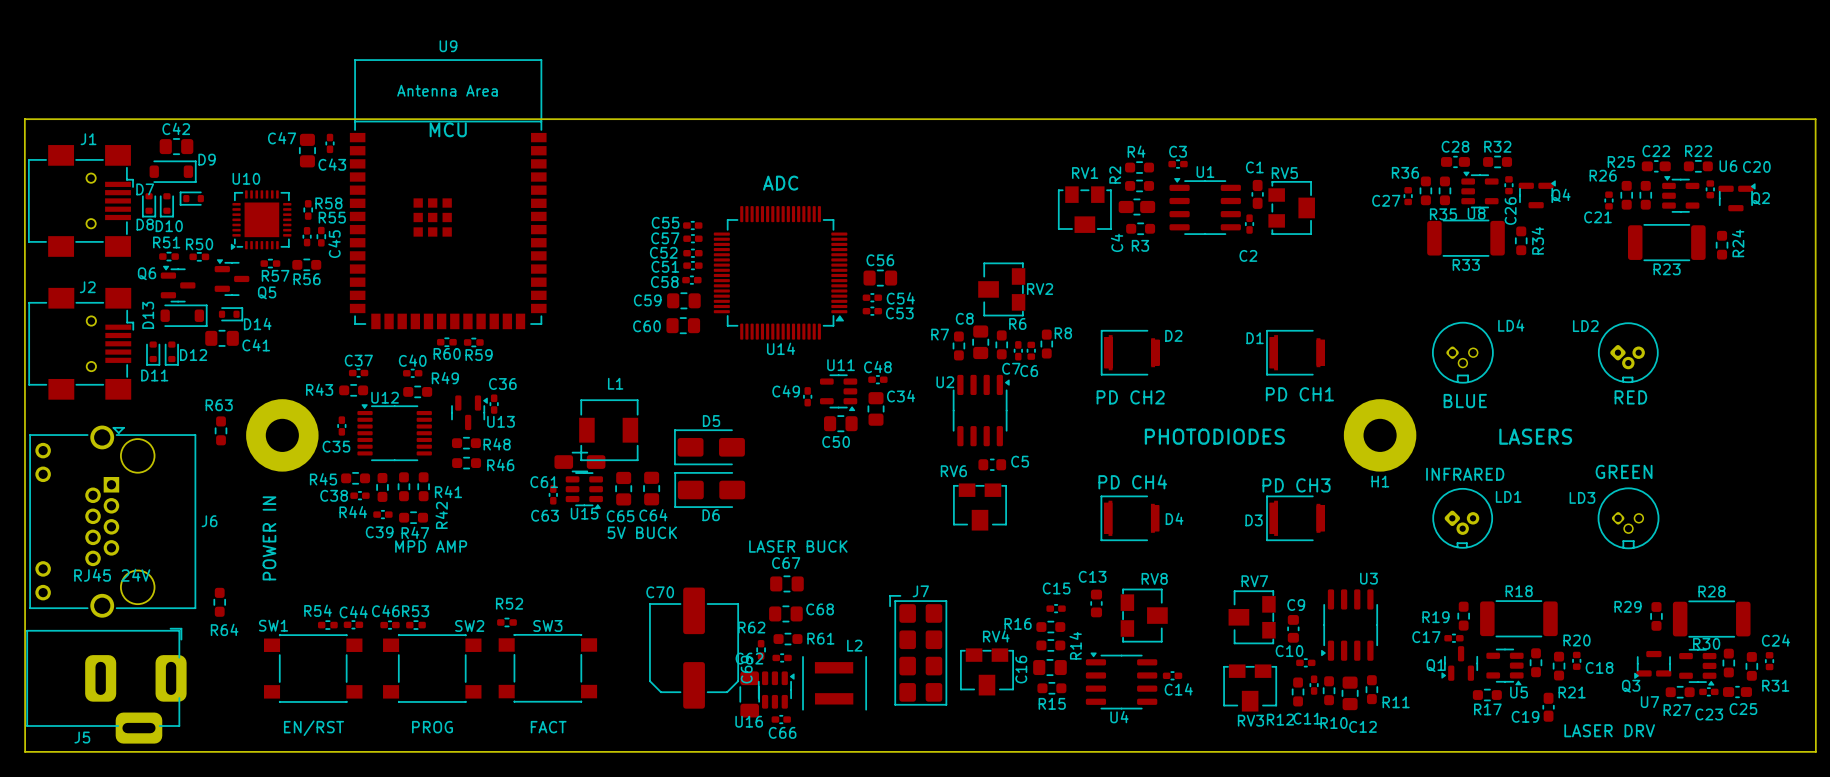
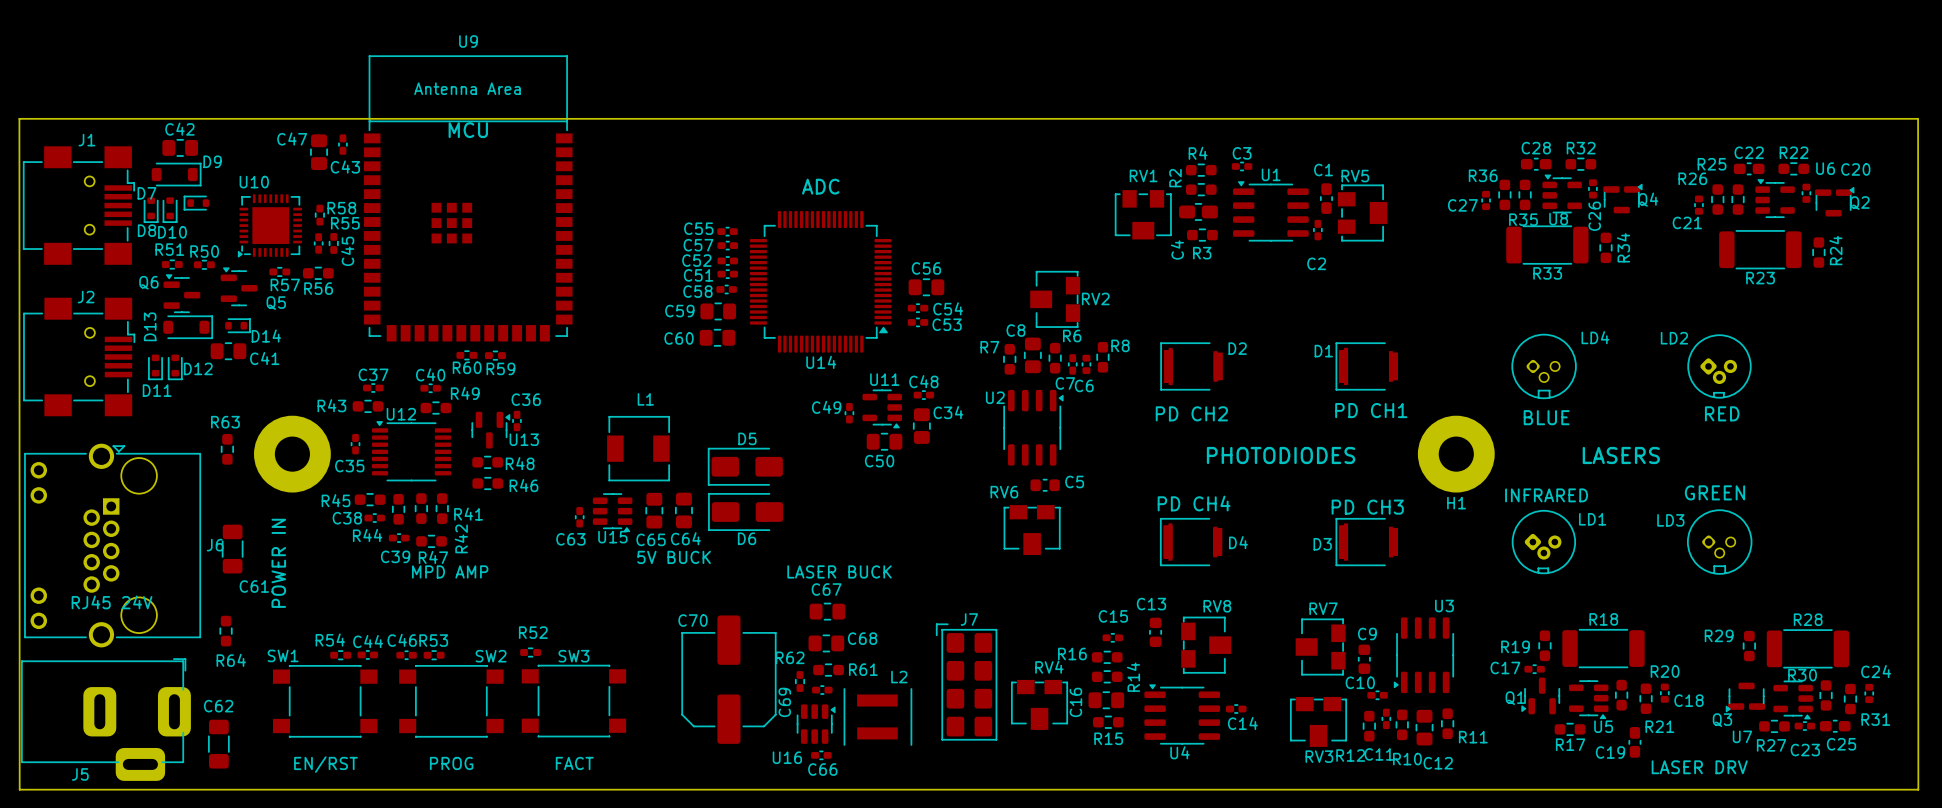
C61 footprint: [554, 452, 606, 473] -> [221, 524, 244, 574]
C61 name position: C61 (544, 482) -> C61 (254, 586)
C62 position: (749, 694) -> (218, 744)

